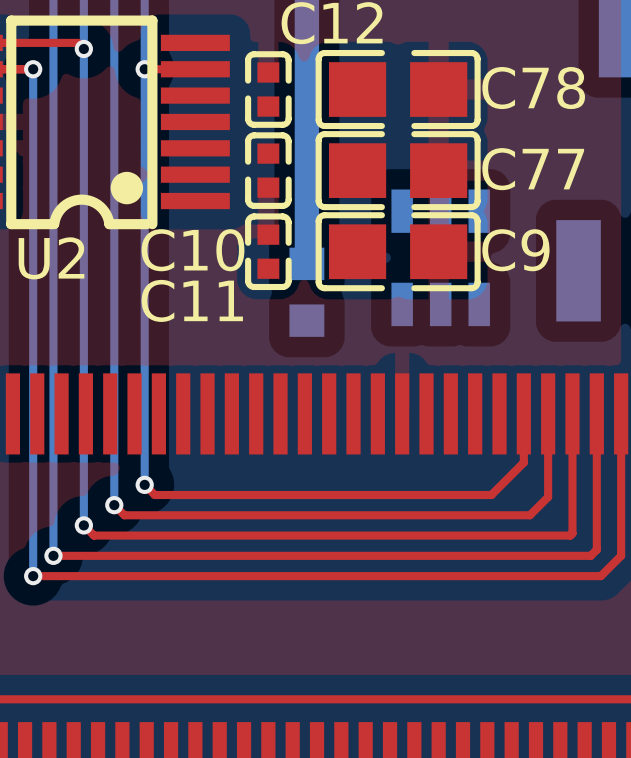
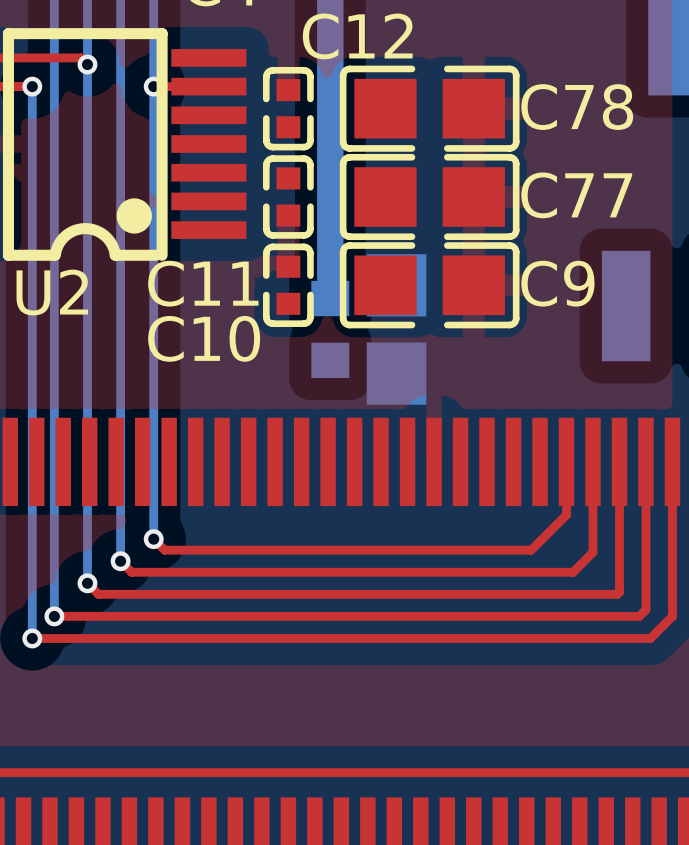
C10 name position: C10 (193, 250) -> C10 (204, 338)
part: (440, 257) -> none
part: none -> (396, 329)
C11 name position: C11 (192, 300) -> C11 (203, 283)

